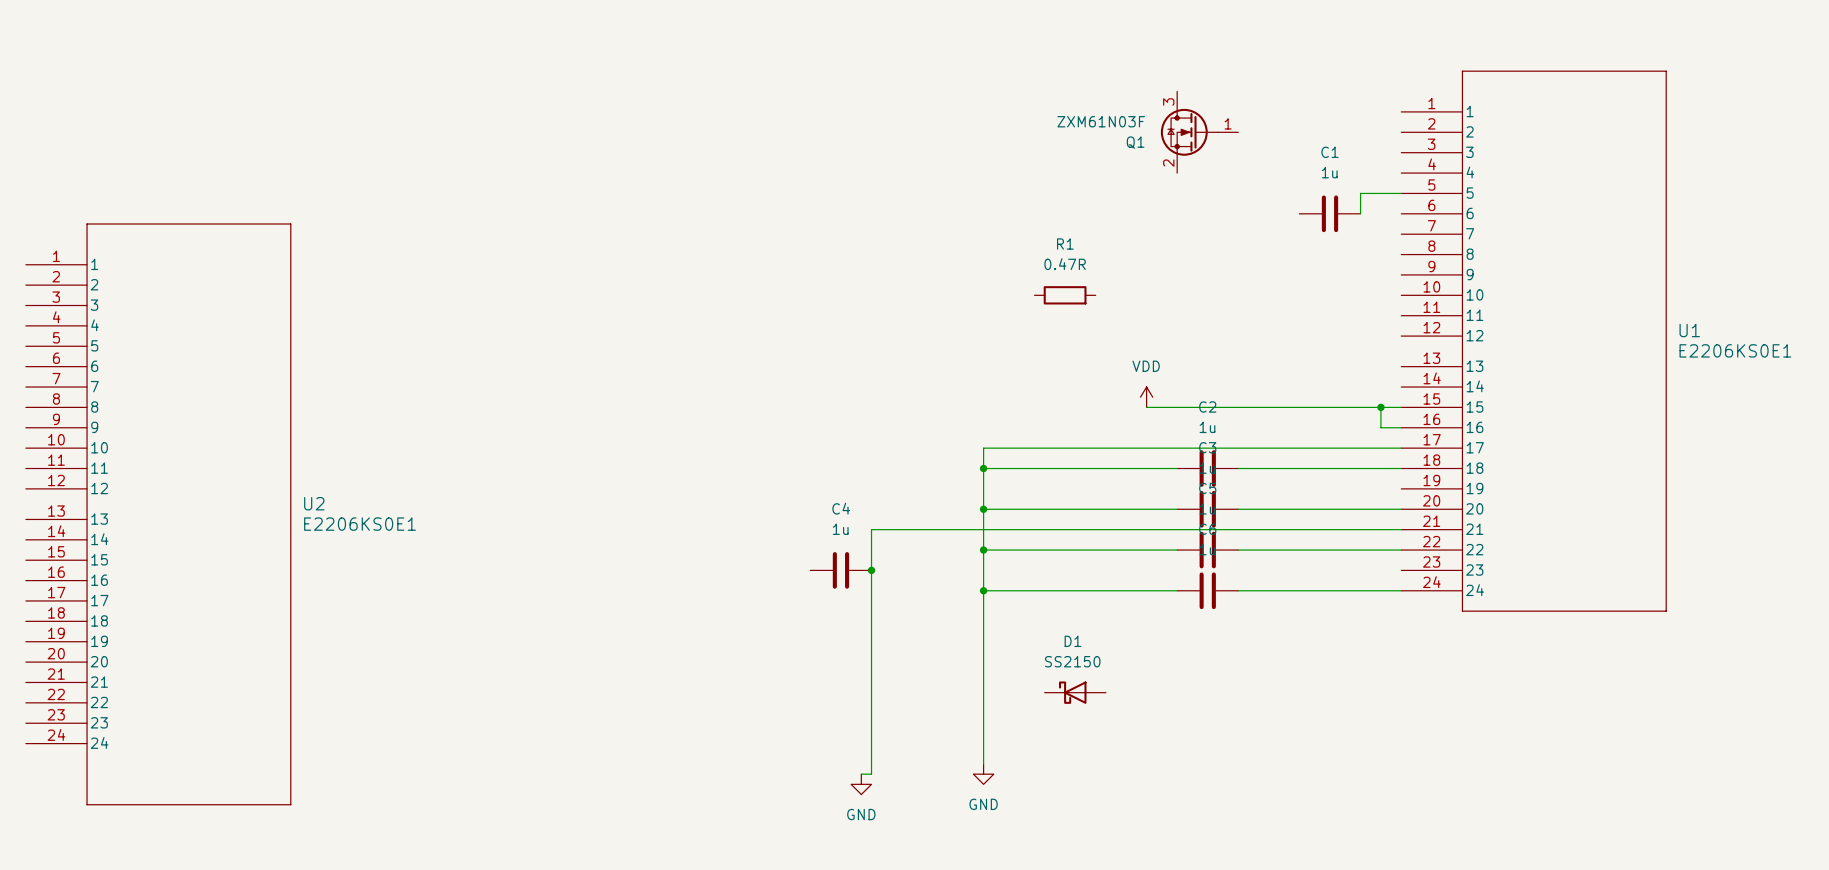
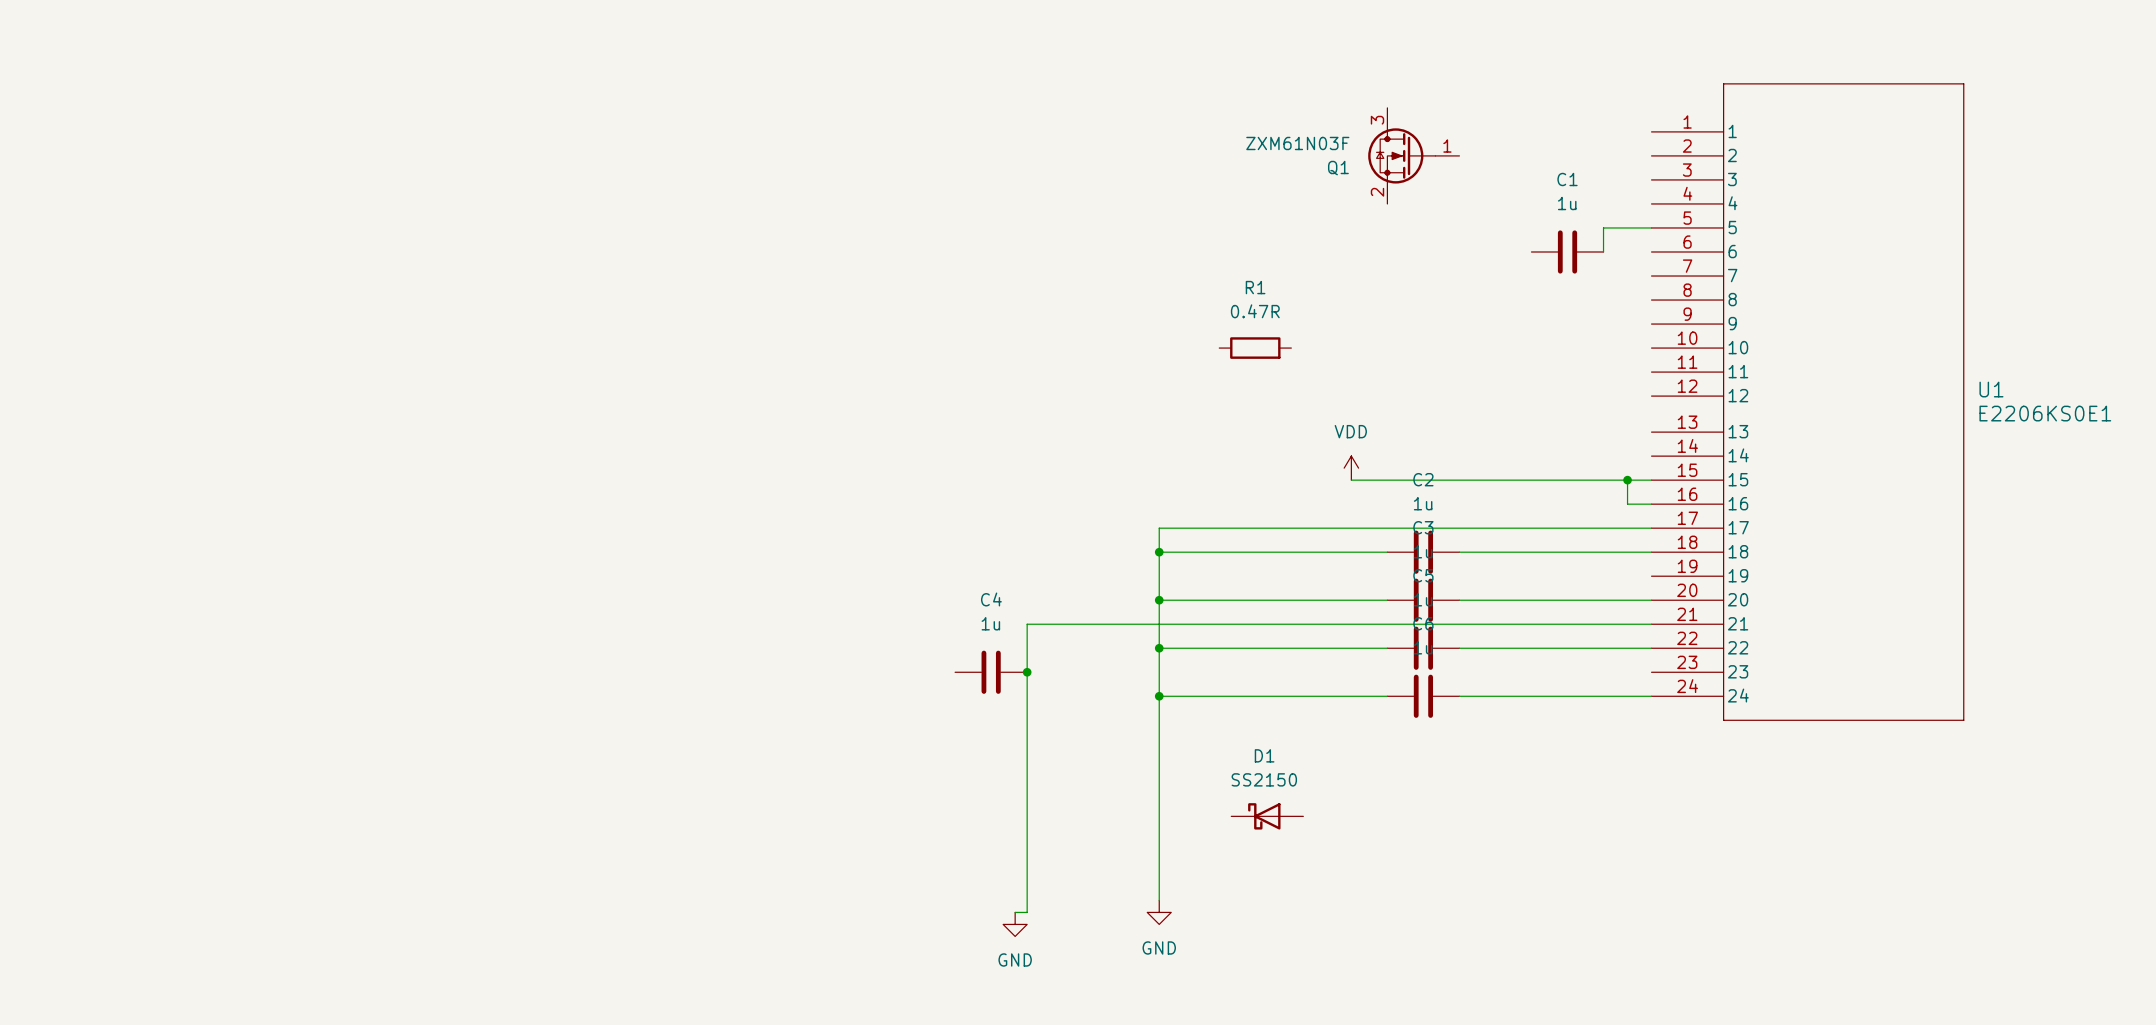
U2: E2206KS0E1 (158, 514) -> none

